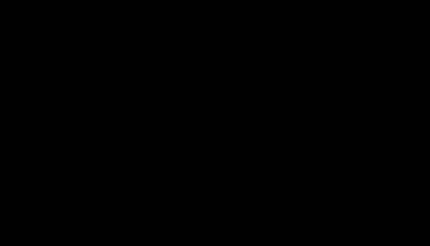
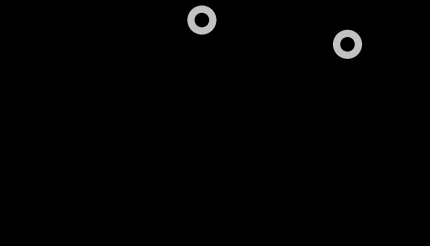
via: none -> (201, 20)
via: none -> (347, 44)

